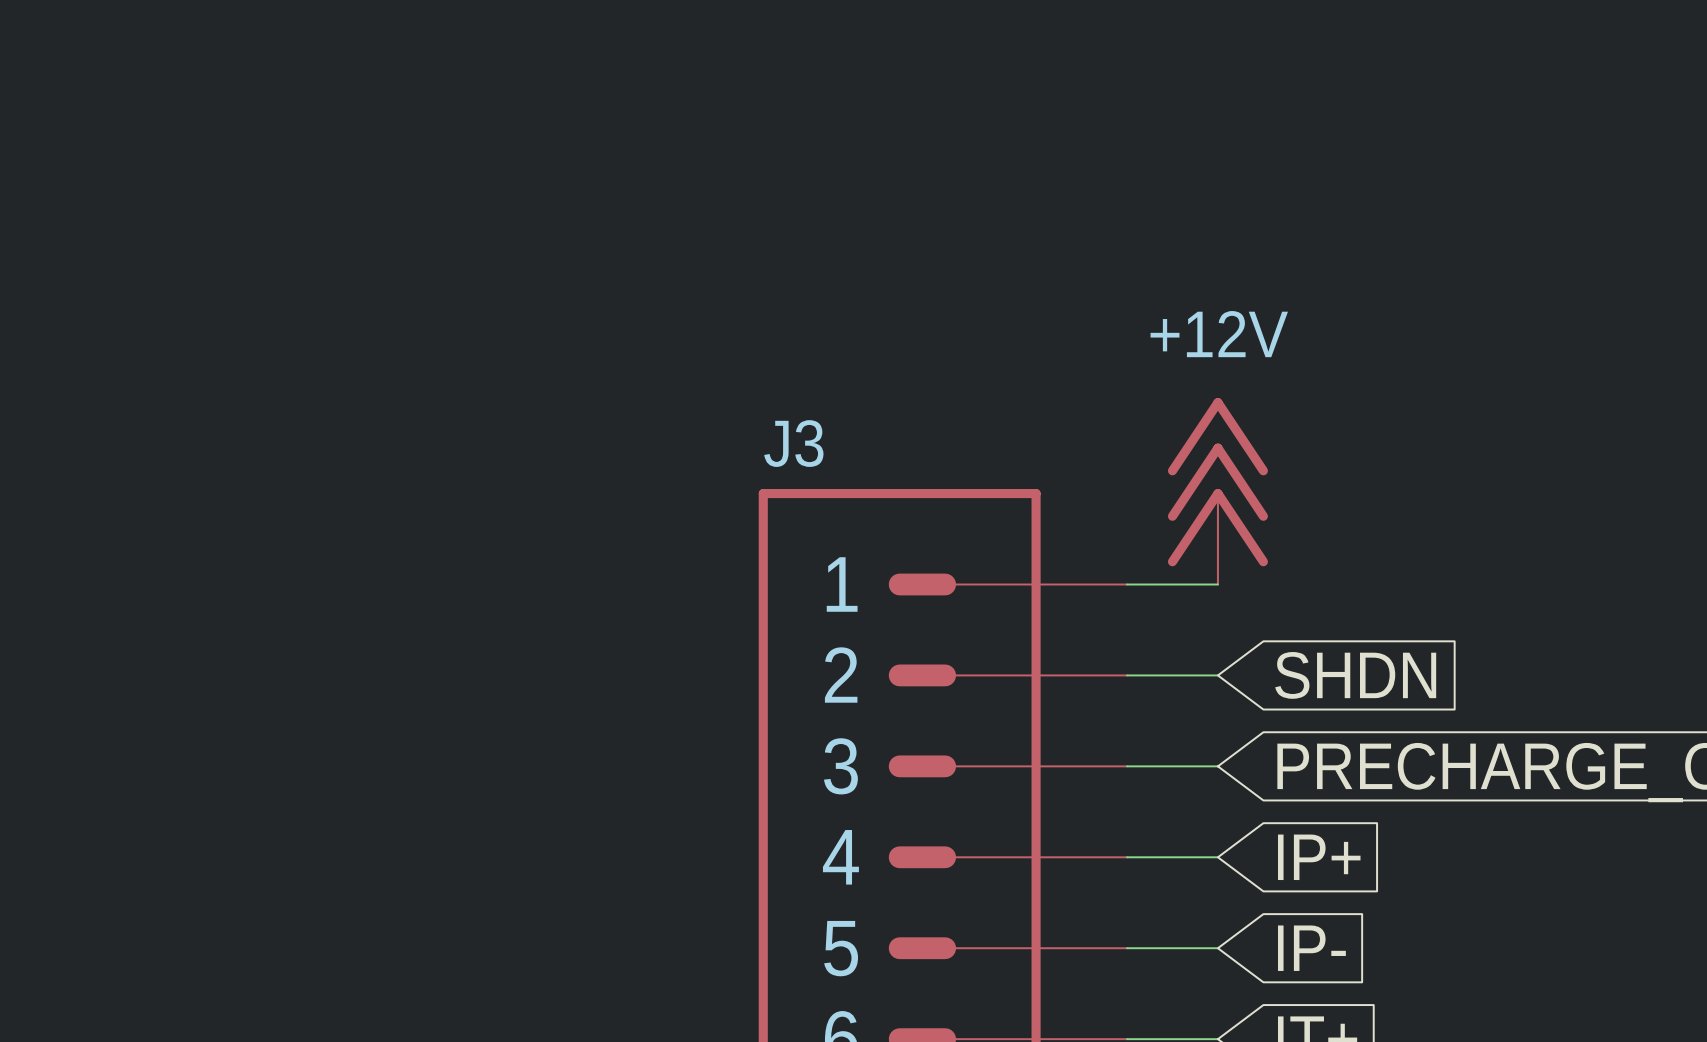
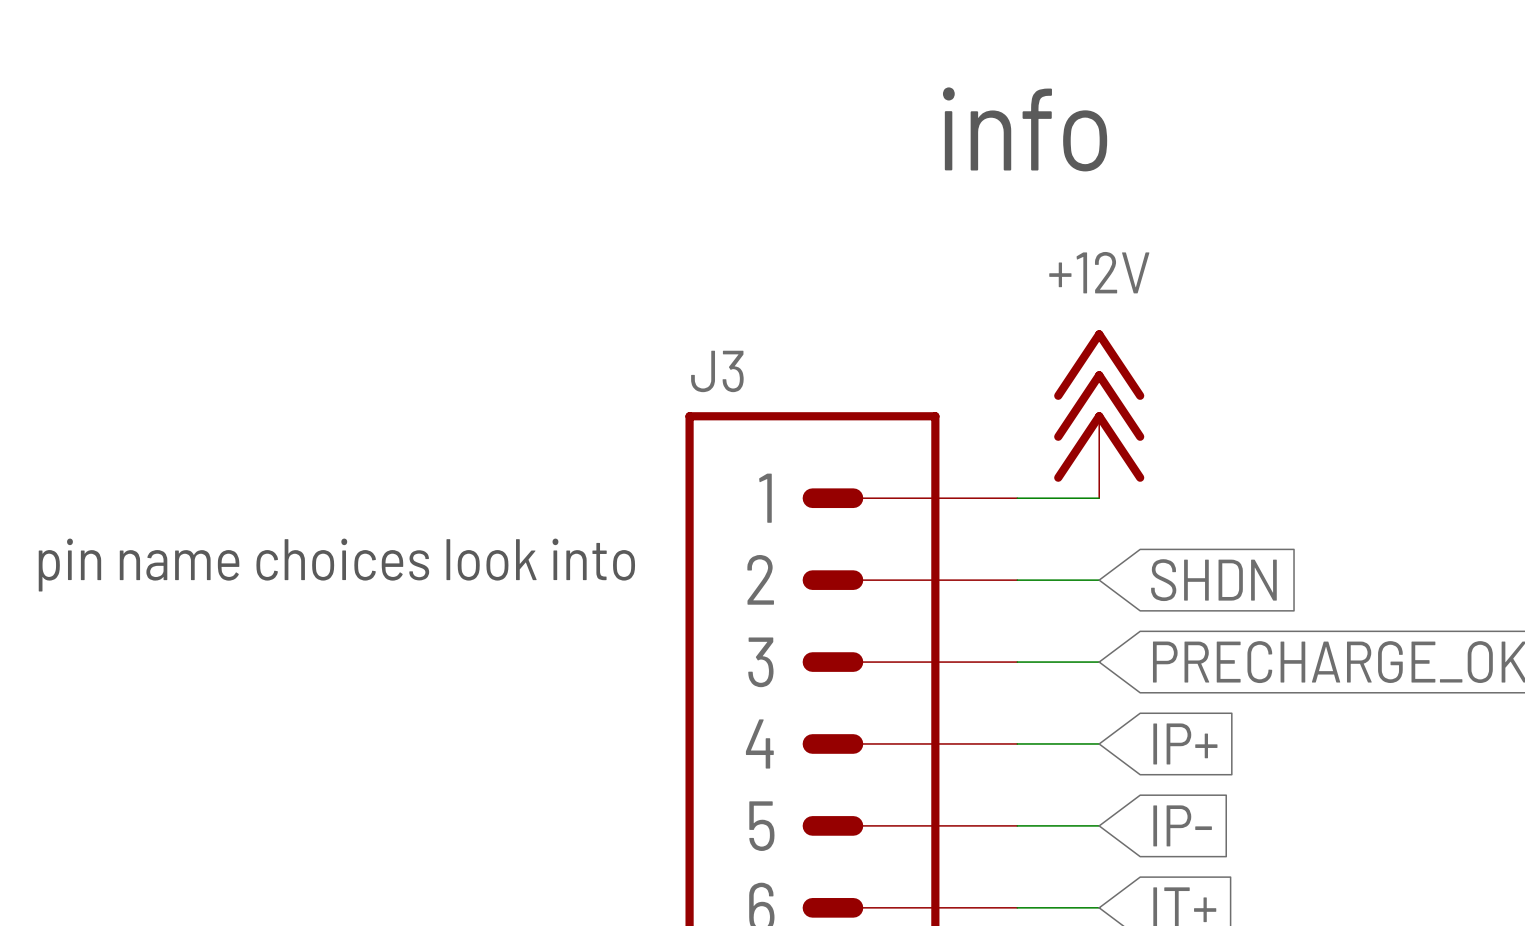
text: none -> info (1025, 129)
text: none -> pin name choices look into (336, 565)

